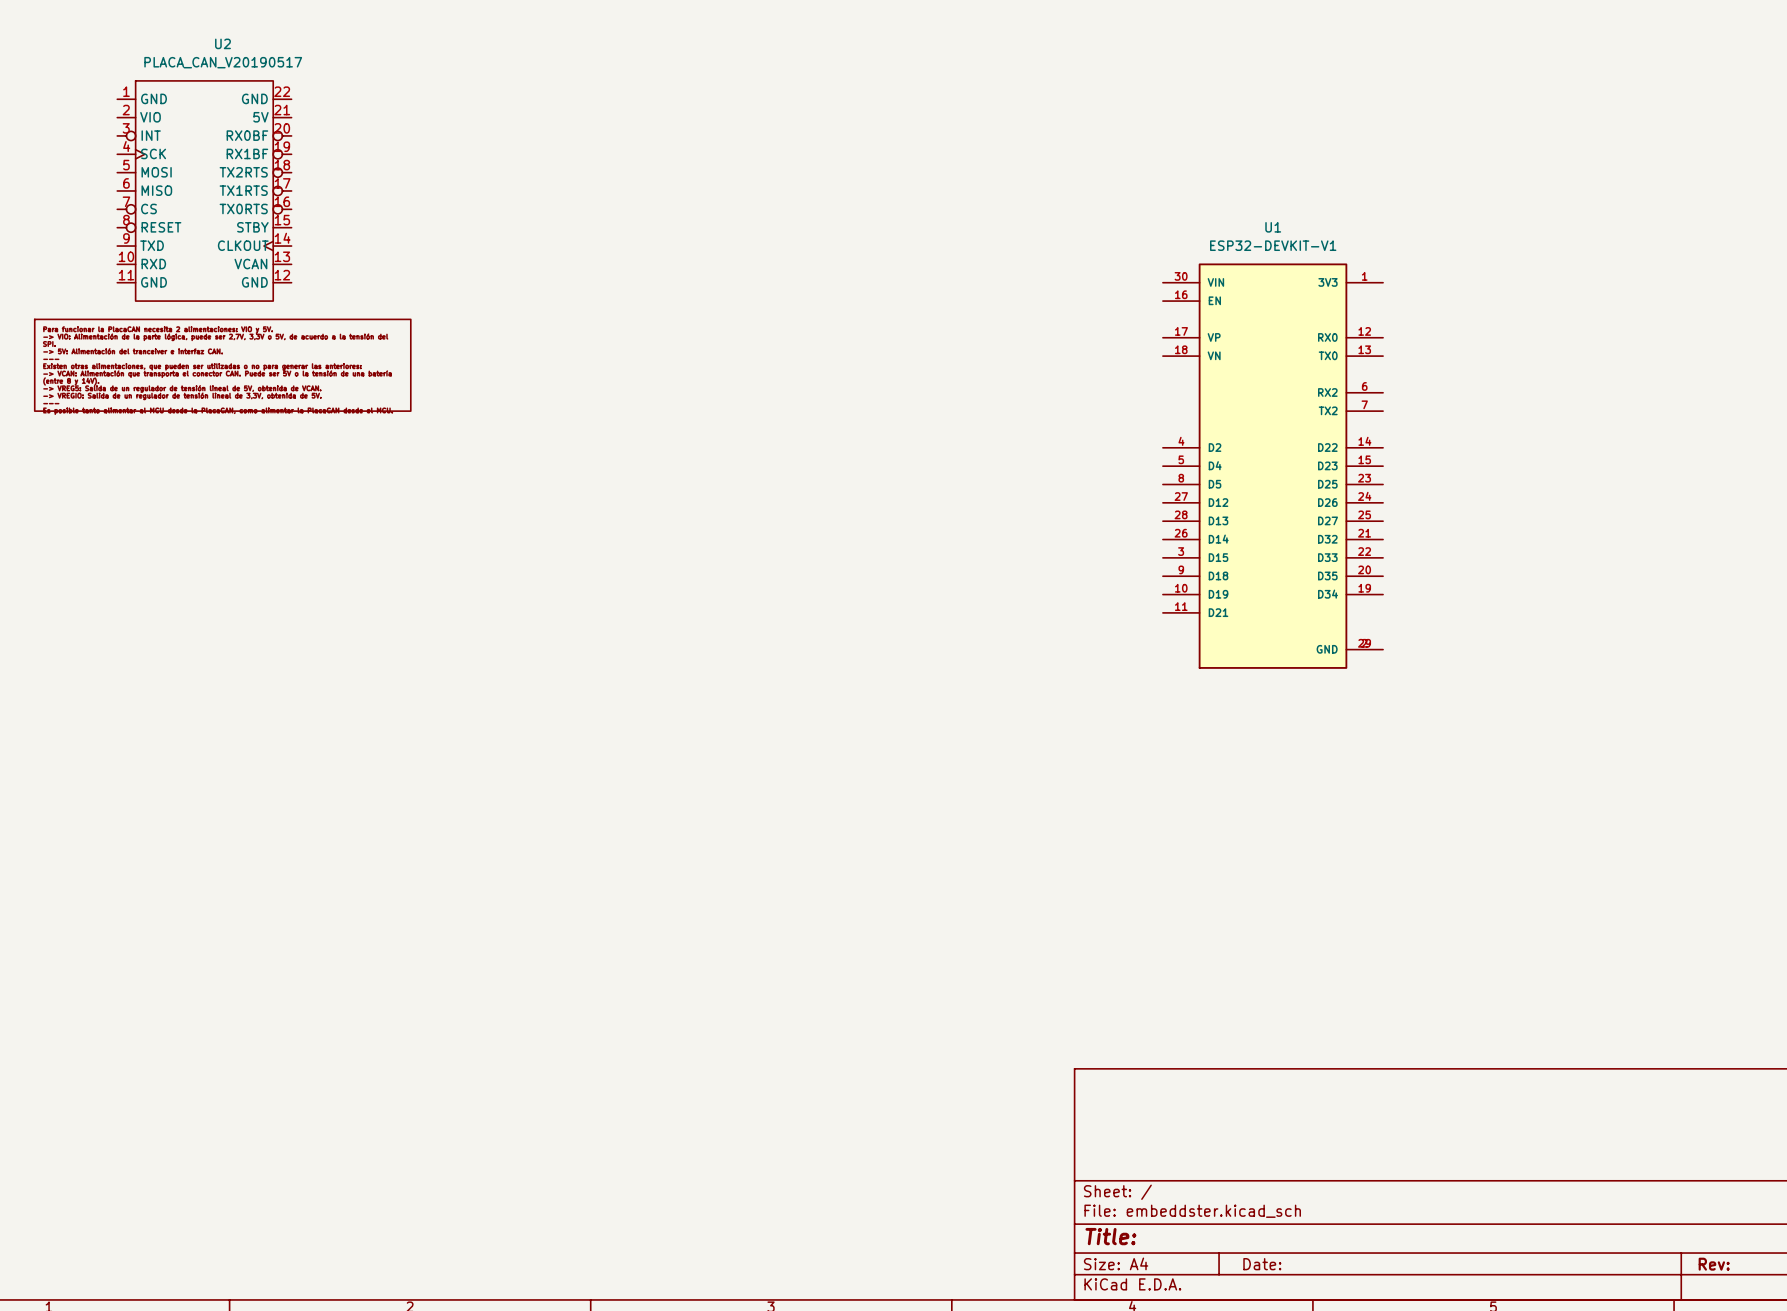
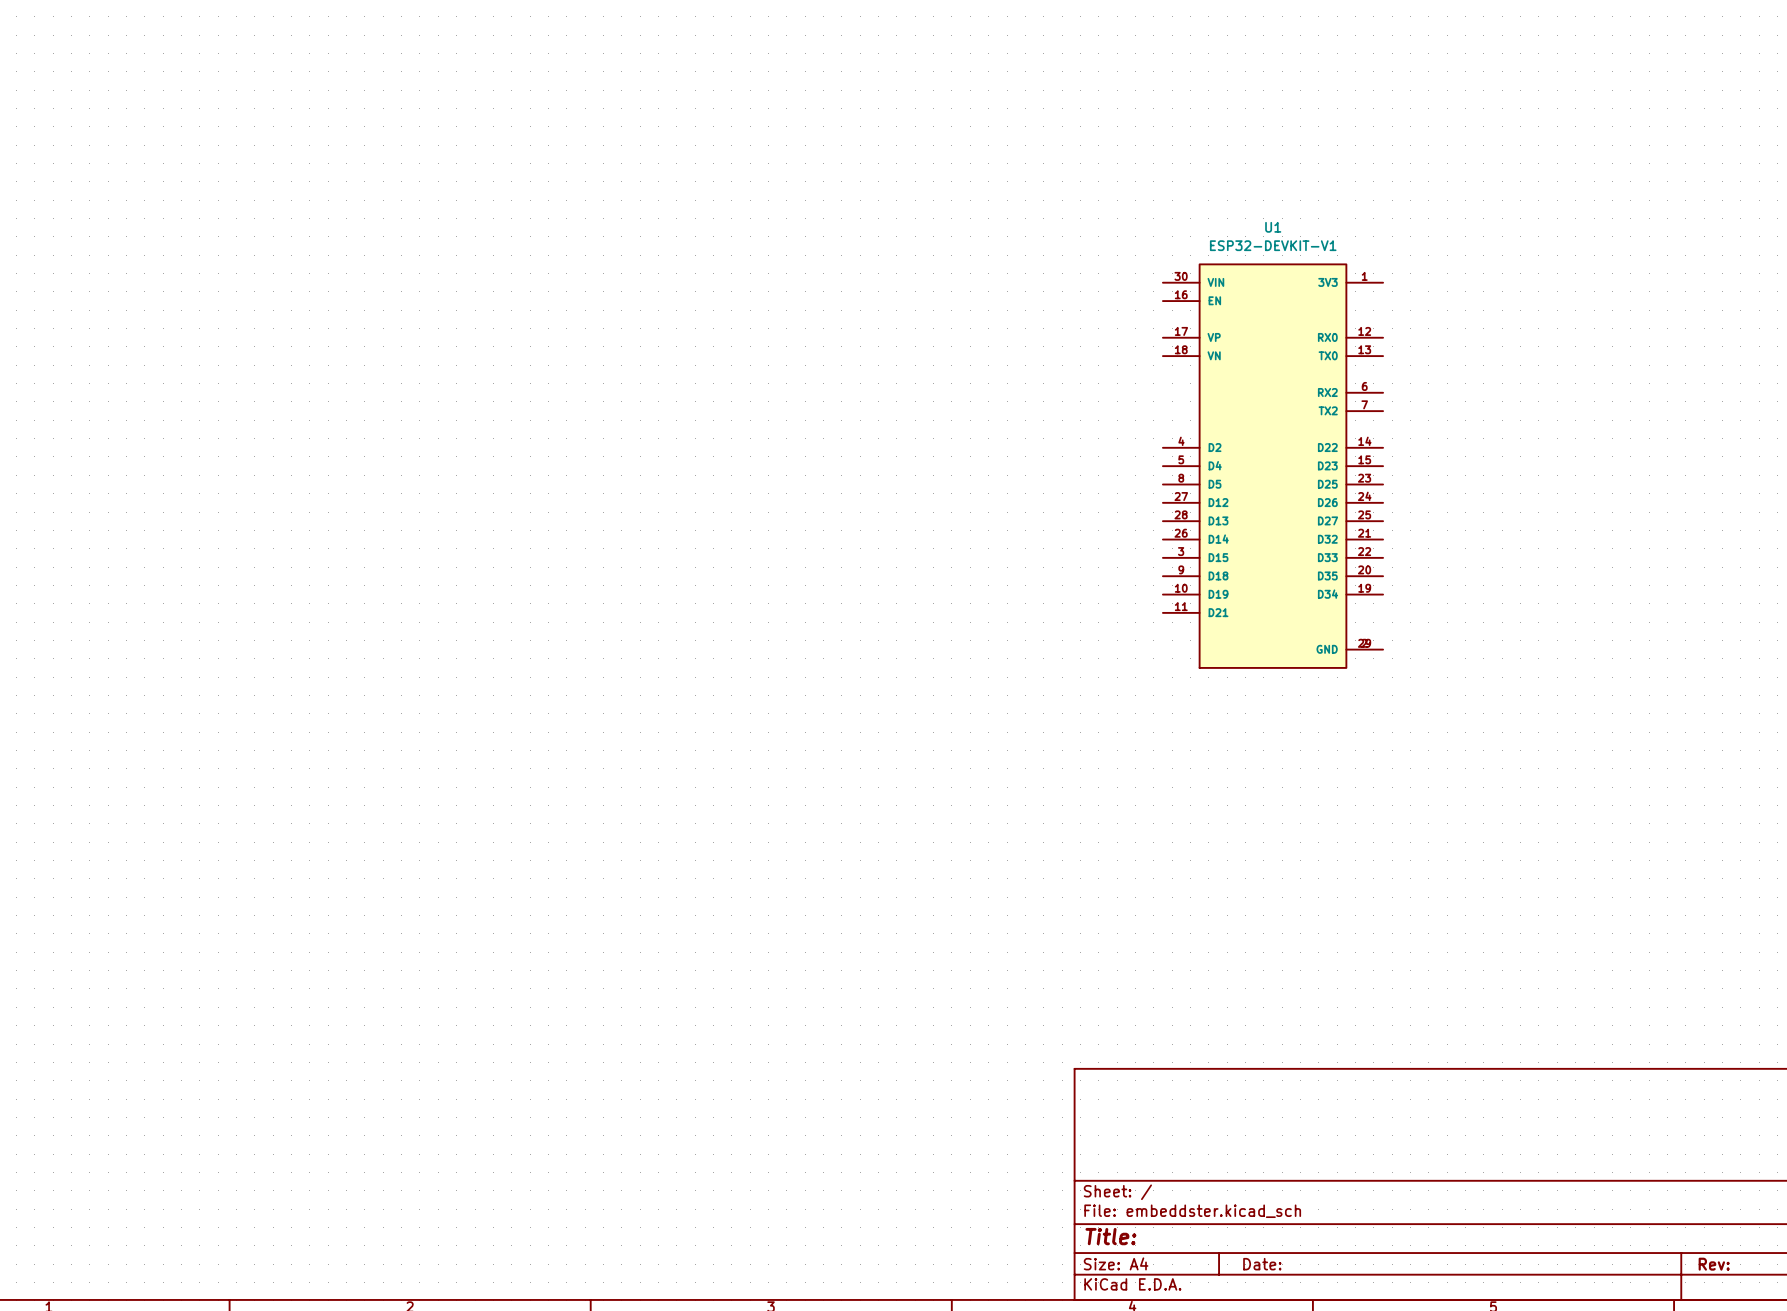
U2: PLACA_CAN_V20190517 (222, 246) -> none

